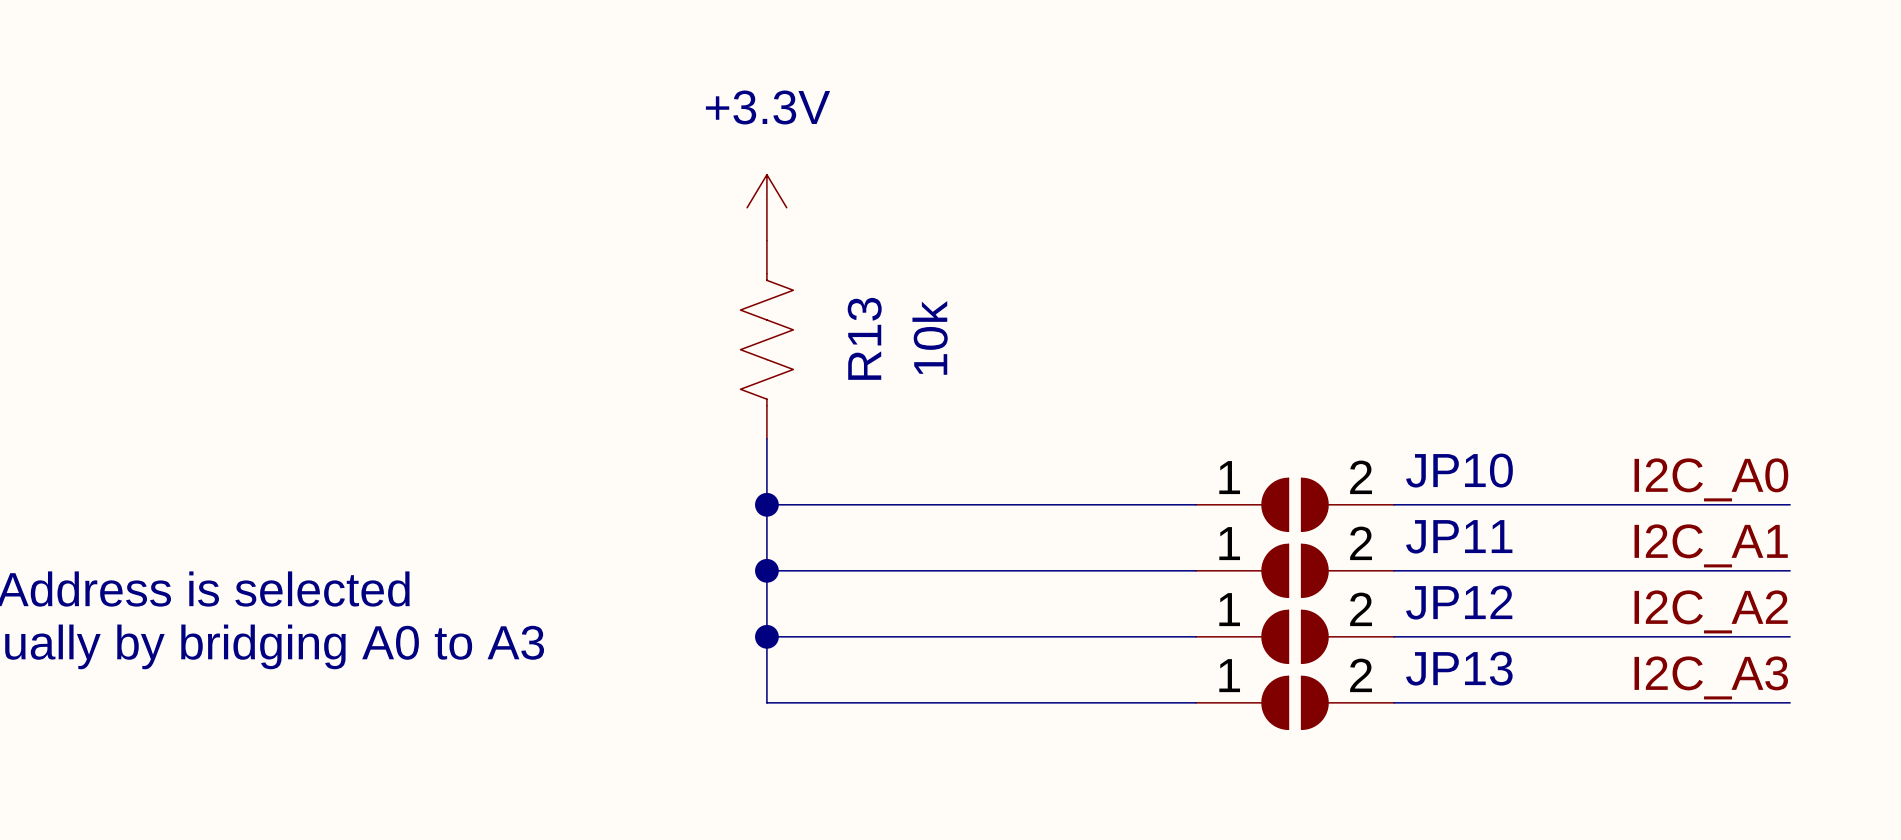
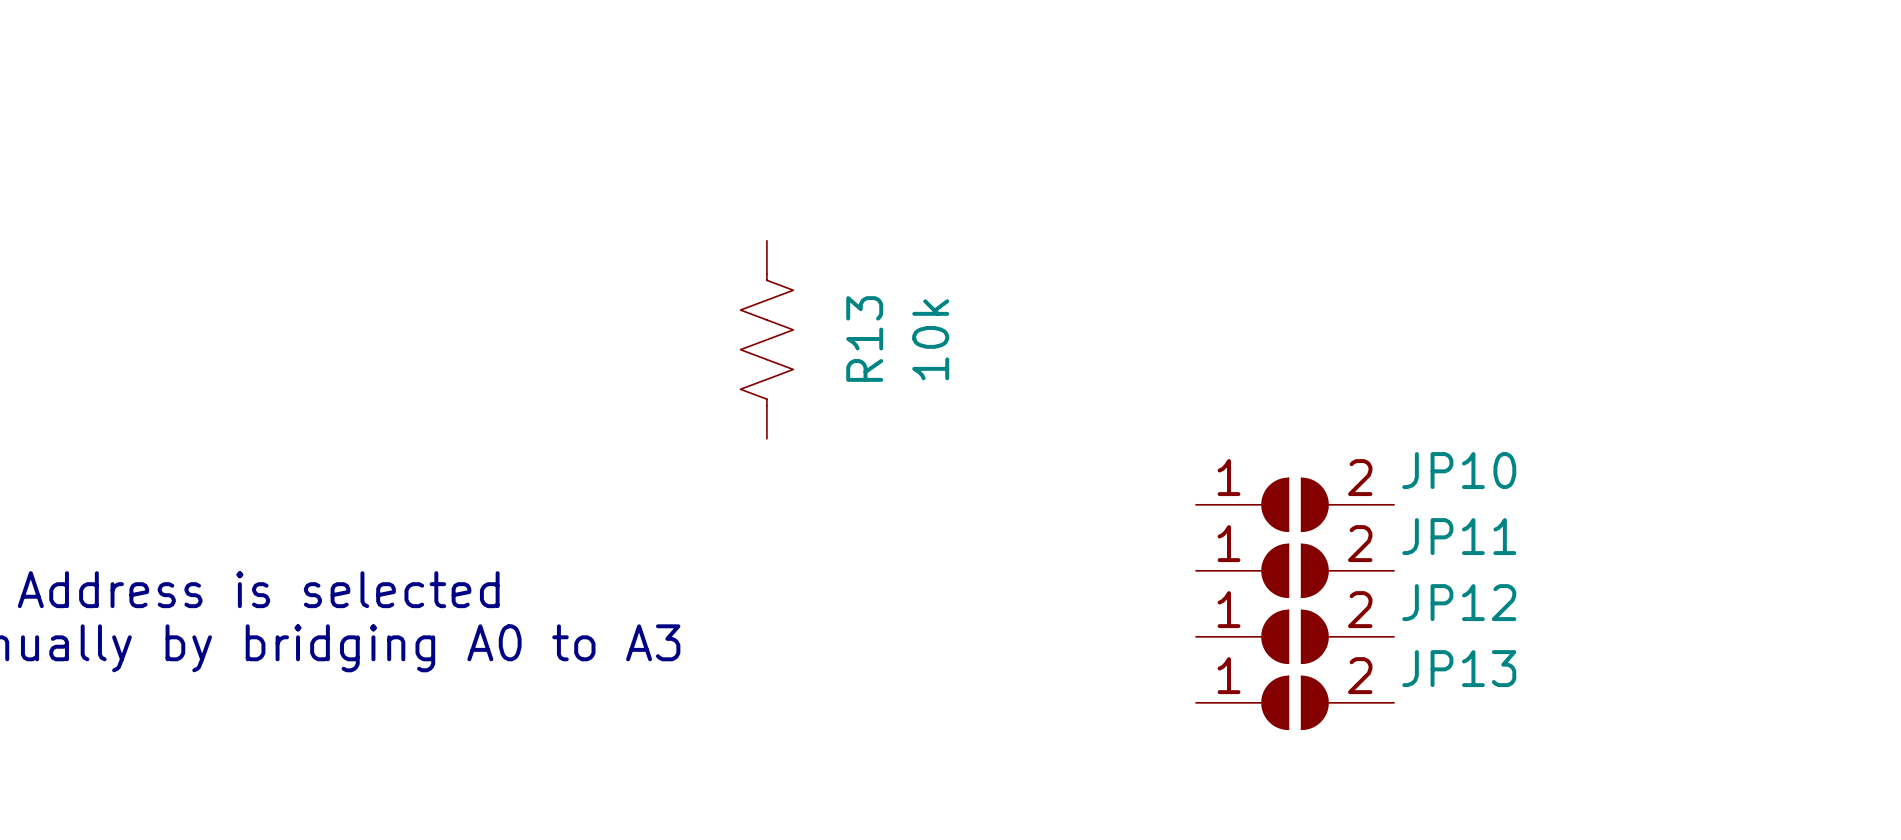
power symbol: +3.3V (766, 207) -> none
wire: (766, 438) (766, 702) (1196, 702) -> none
label: I2C_A0 (1711, 479) -> none
wire: (766, 504) (1196, 504) -> none
junction: (766, 504) -> none
wire: (1394, 504) (1790, 504) -> none
label: I2C_A1 (1711, 545) -> none
wire: (766, 570) (1196, 570) -> none
junction: (766, 570) -> none
wire: (1394, 570) (1790, 570) -> none
label: I2C_A2 (1711, 611) -> none
wire: (766, 636) (1196, 636) -> none
junction: (766, 636) -> none
wire: (1394, 636) (1790, 636) -> none
label: I2C_A3 (1711, 677) -> none
wire: (1394, 702) (1790, 702) -> none

